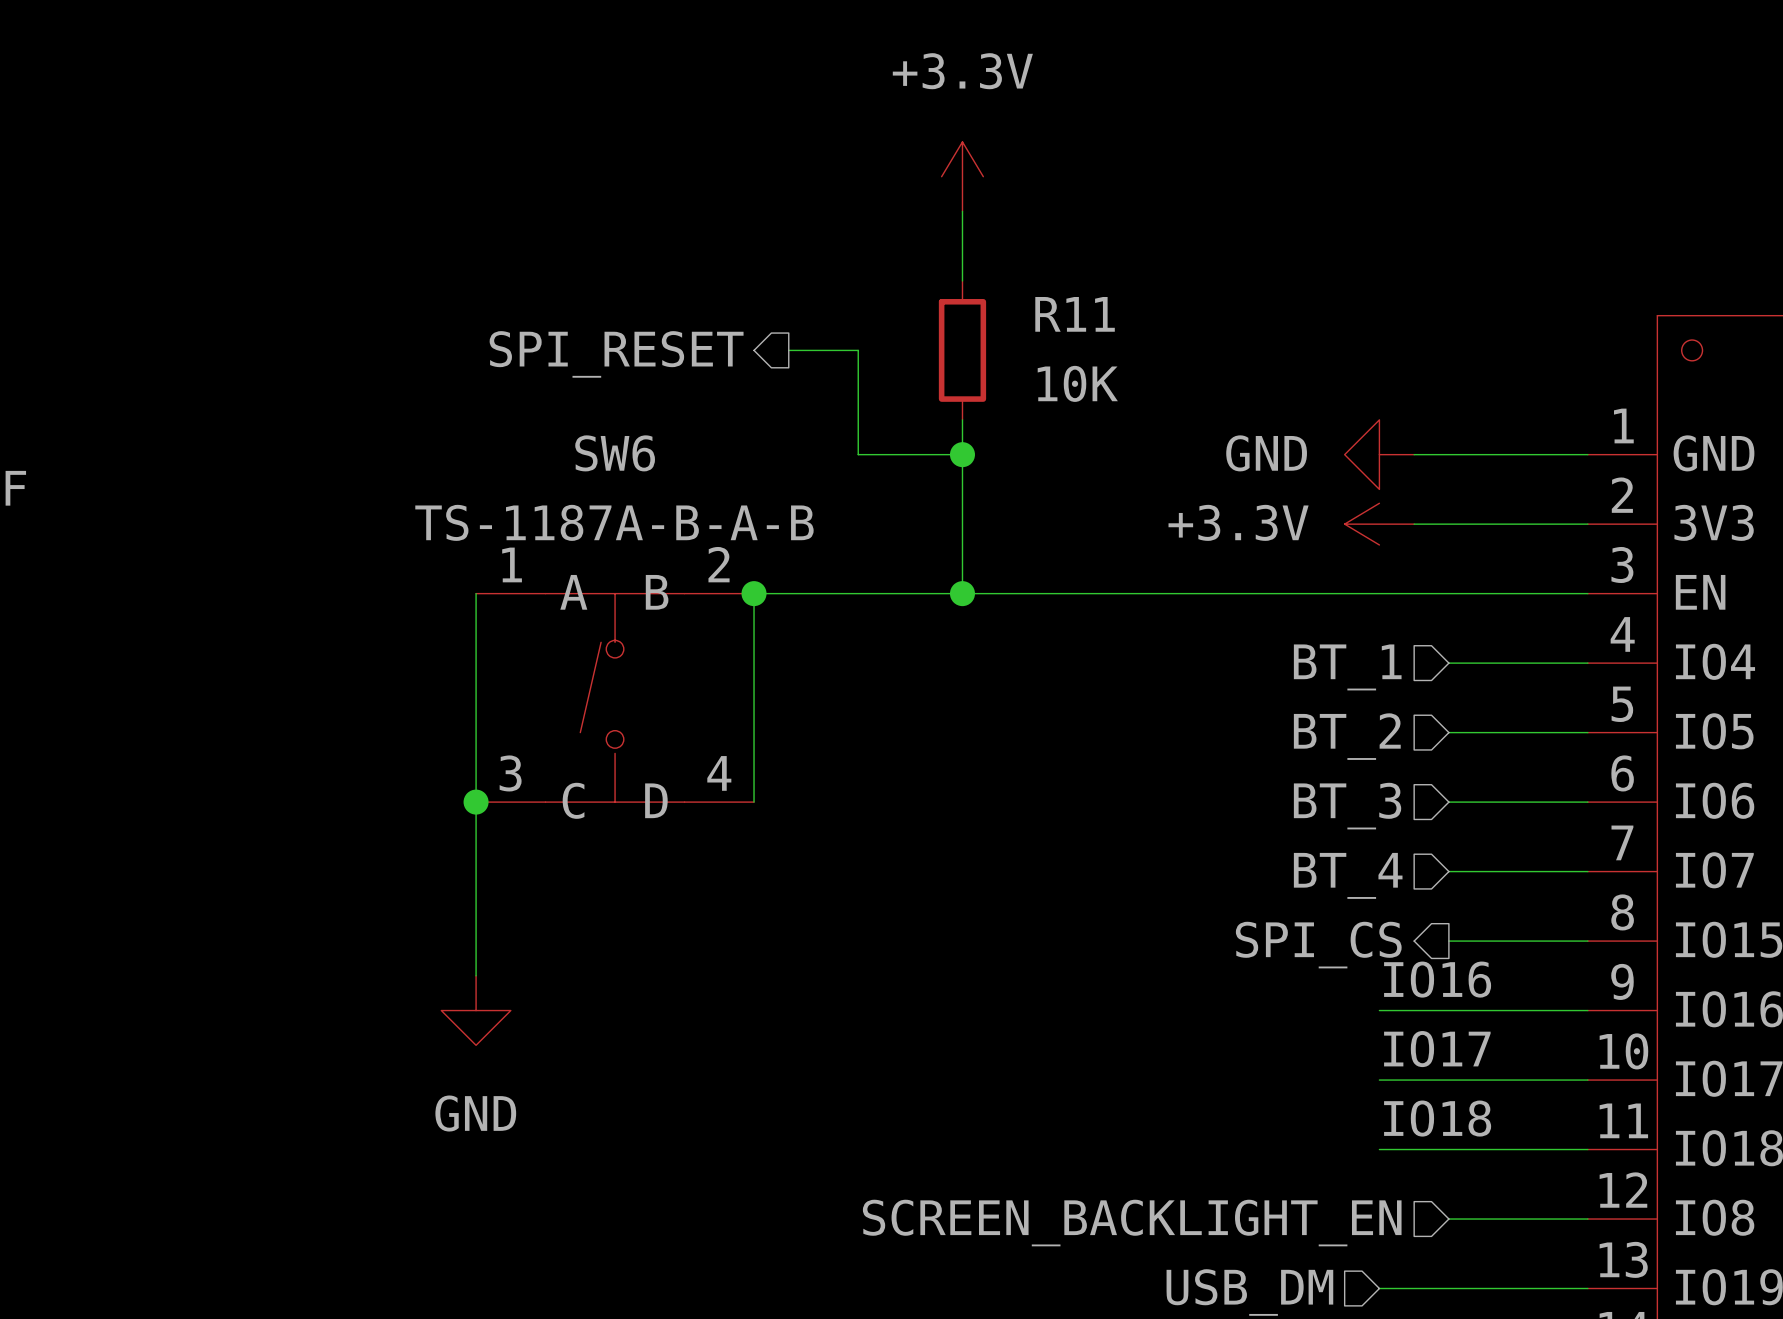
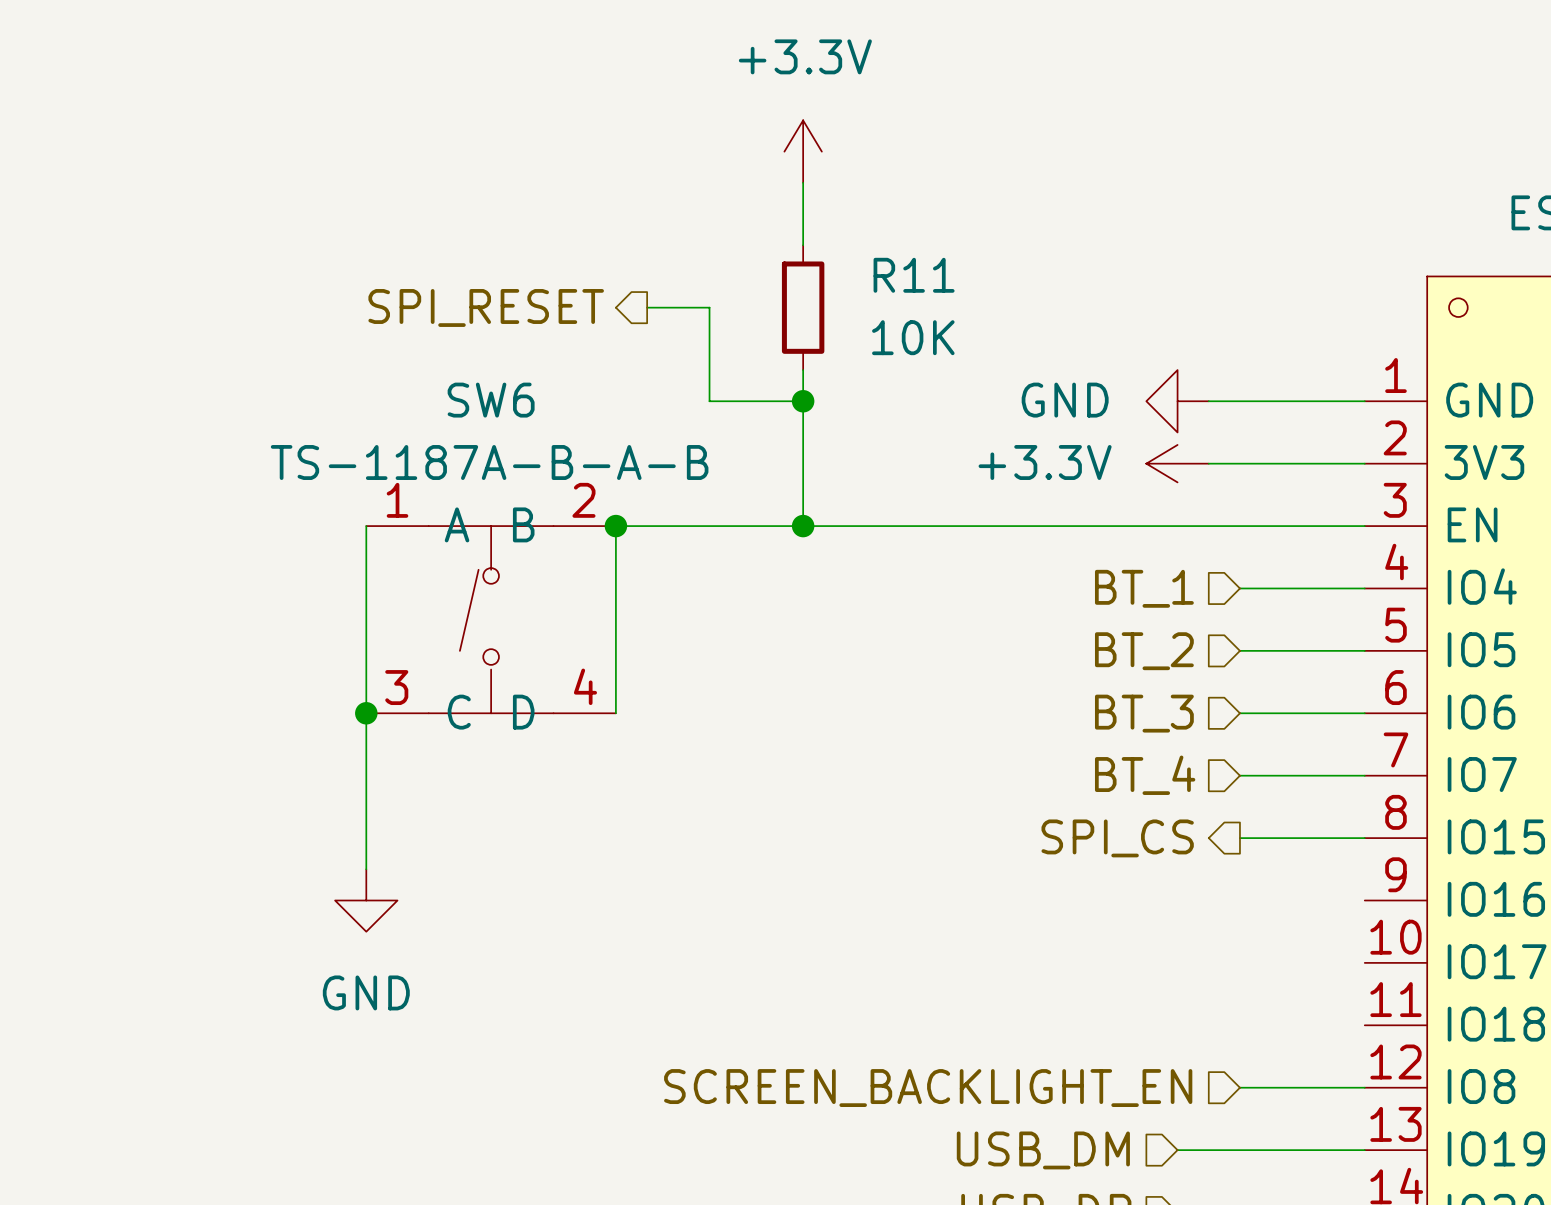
label: IO16 (1437, 979) -> none
wire: (1379, 1010) (1587, 1010) -> none
label: IO17 (1437, 1049) -> none
wire: (1379, 1080) (1587, 1080) -> none
label: IO18 (1437, 1118) -> none
wire: (1379, 1149) (1587, 1149) -> none

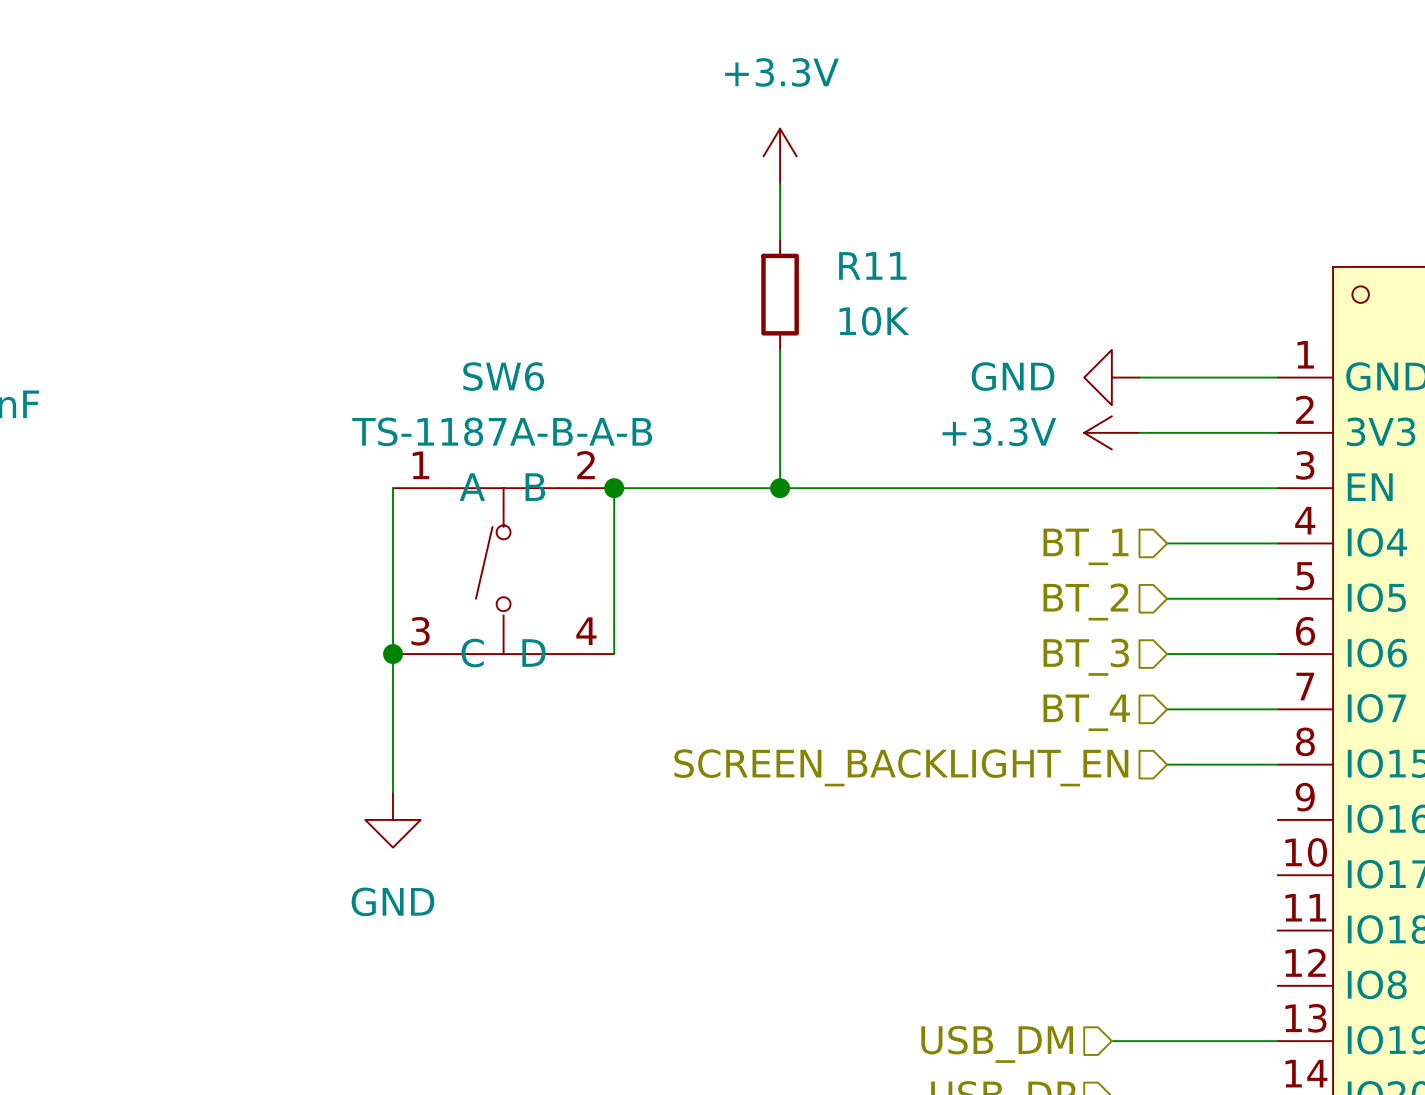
hierarchical label: SPI_RESET (486, 307) -> none
wire: (647, 307) (709, 307) (709, 401) (803, 401) -> none
junction: (803, 401) -> none
hierarchical label shape: output (1117, 838) -> input (901, 767)
hierarchical label: SPI_CS (1117, 838) -> SCREEN_BACKLIGHT_EN (901, 767)
wire: (1239, 1087) (1364, 1087) -> none
hierarchical label: SCREEN_BACKLIGHT_EN (928, 1088) -> none

